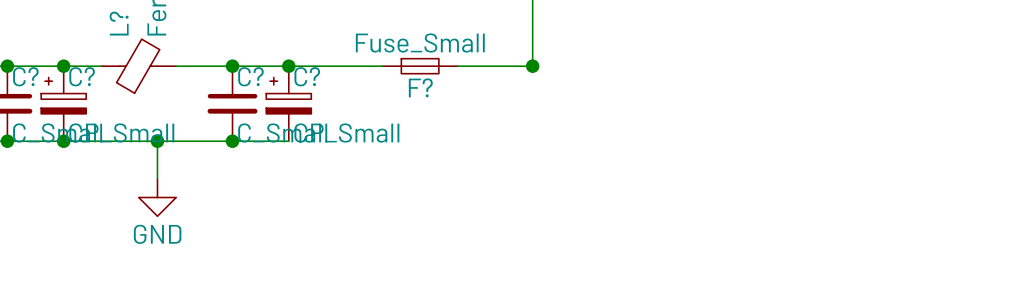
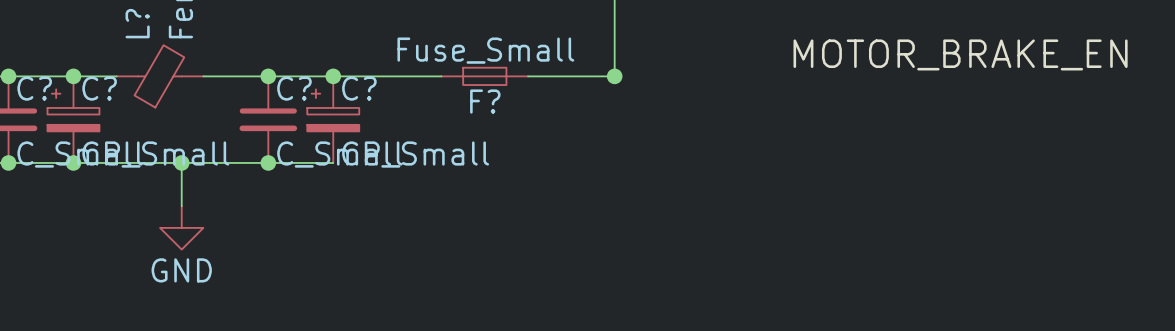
label: none -> MOTOR_BRAKE_EN (960, 54)

